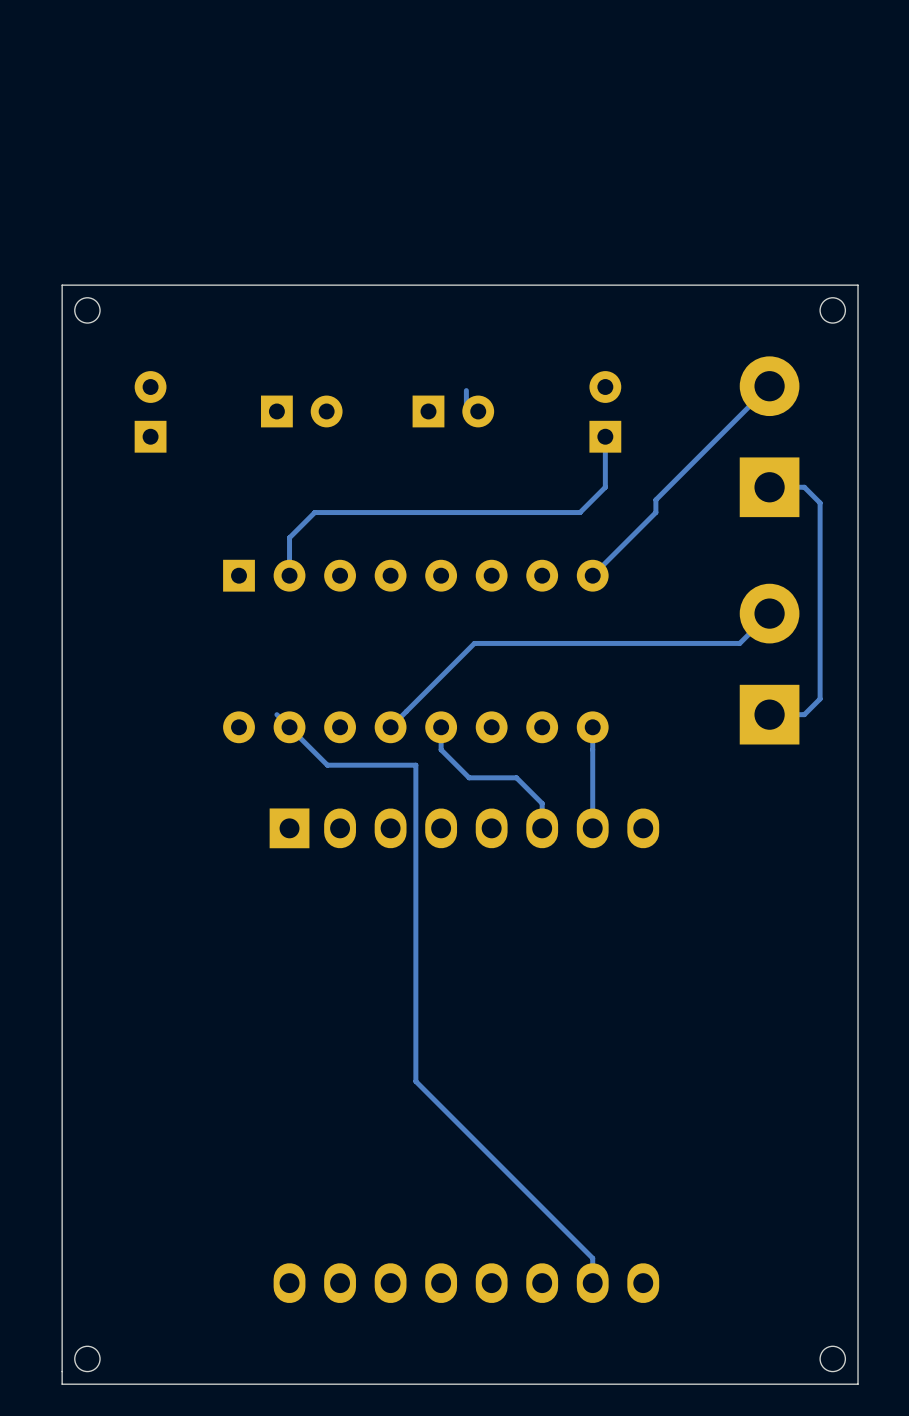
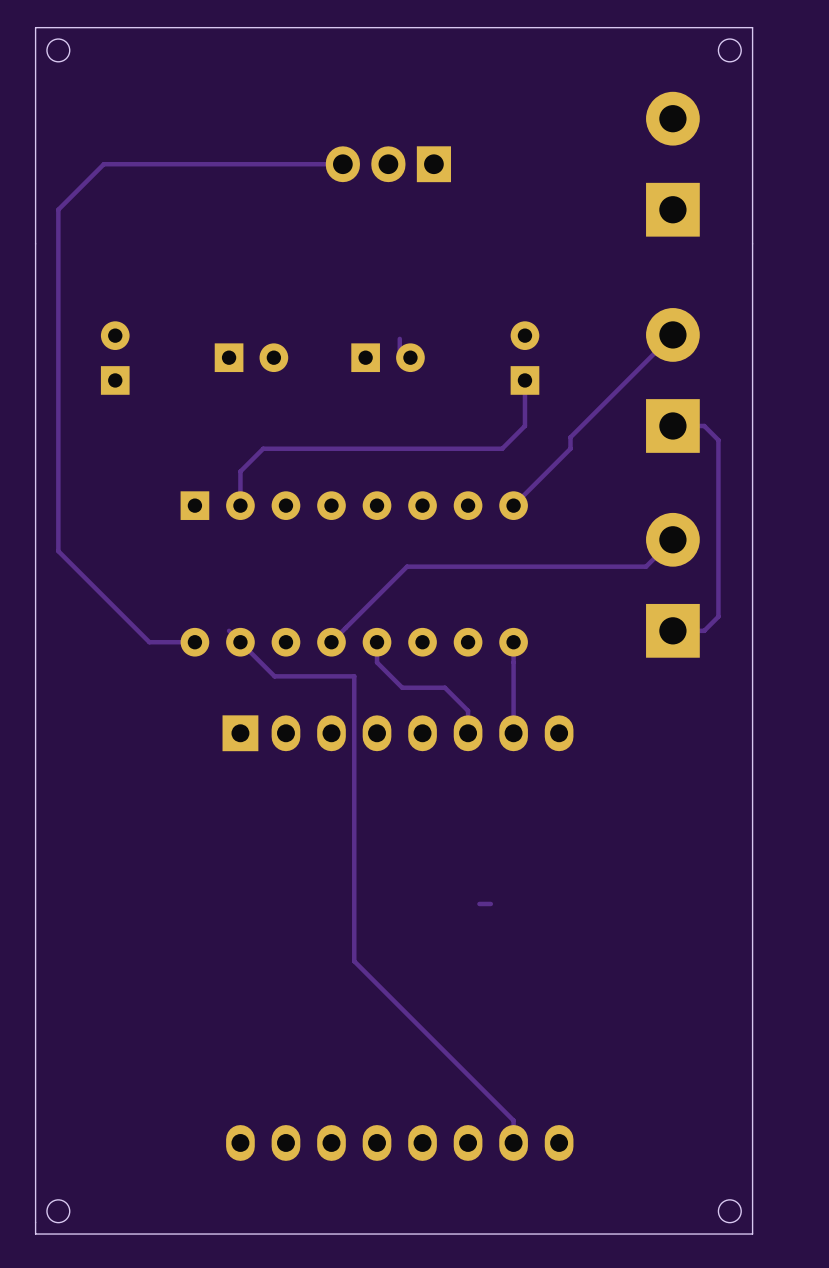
track: none -> (342, 164) (103, 164) (58, 209) (58, 551) (149, 642) (194, 642)
part: none -> (388, 164)
part: none -> (672, 164)
board edge: (858, 285) (62, 285) -> (752, 243) (752, 27) (35, 27) (35, 243)
round board edge position: (87, 310) -> (58, 50)
round board edge position: (832, 310) -> (729, 50)
track: none -> (490, 903) (479, 903)

